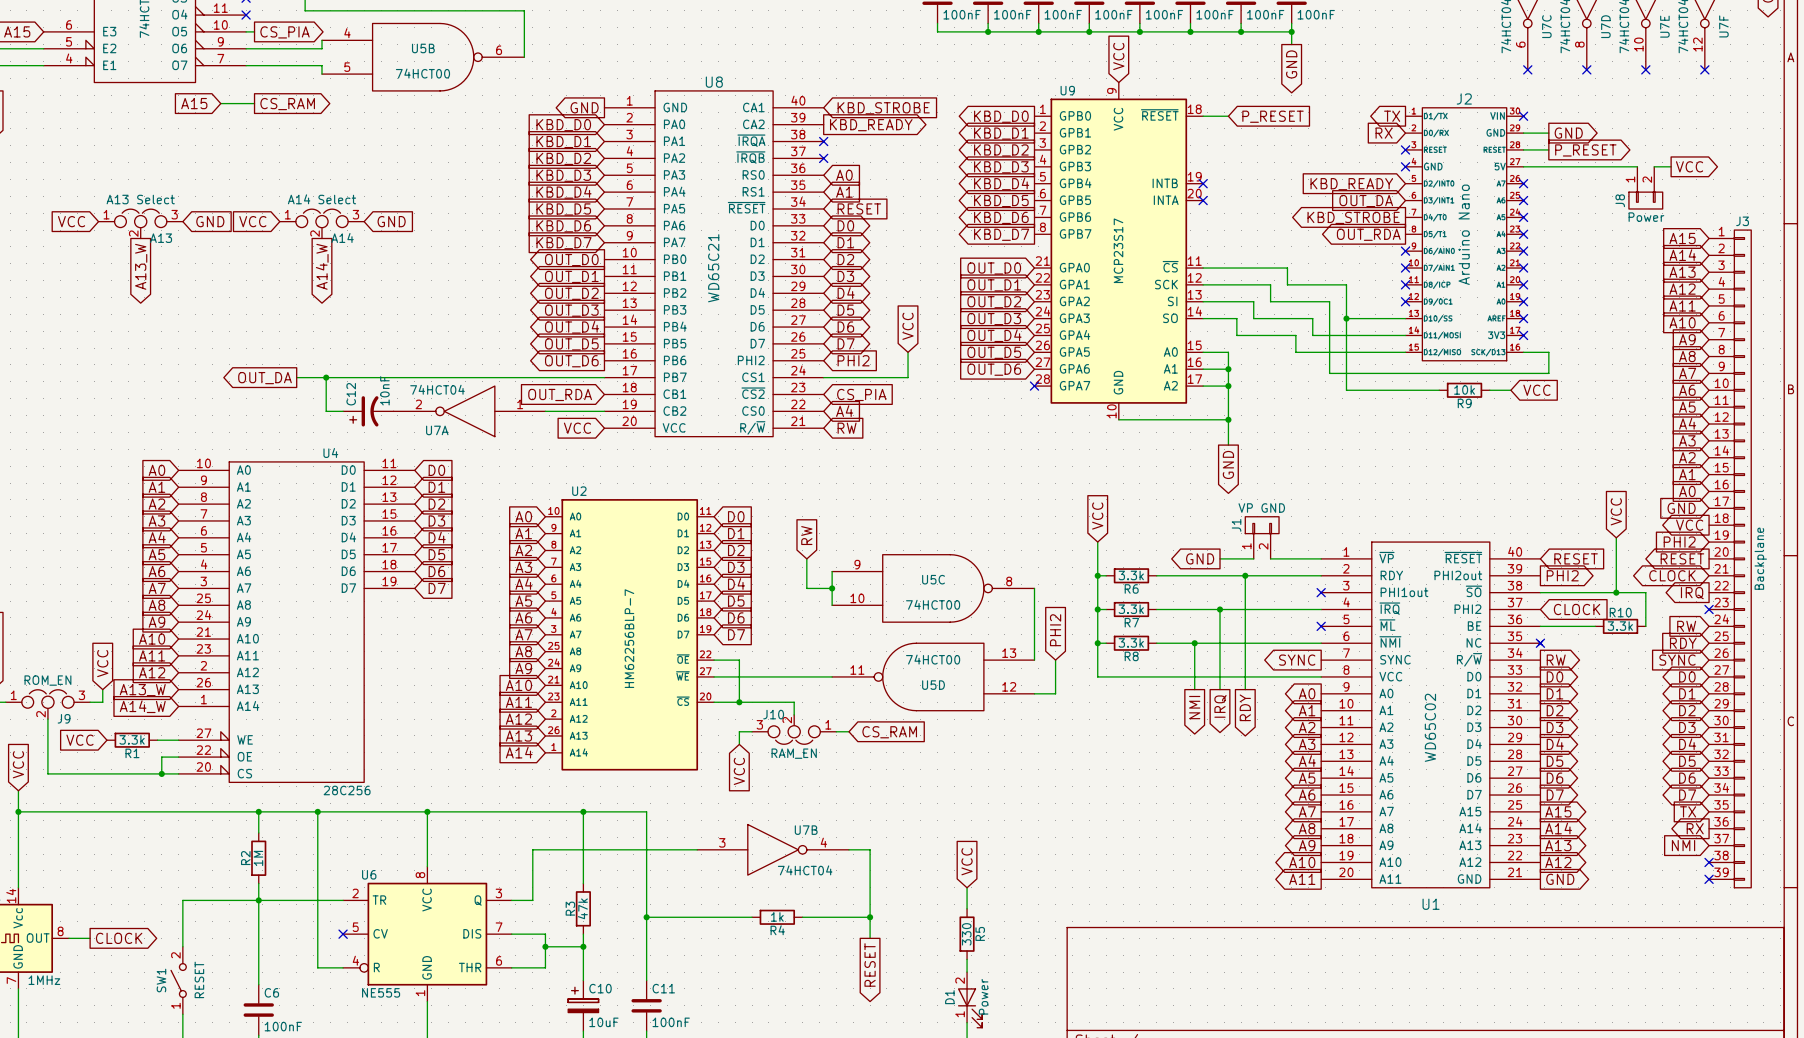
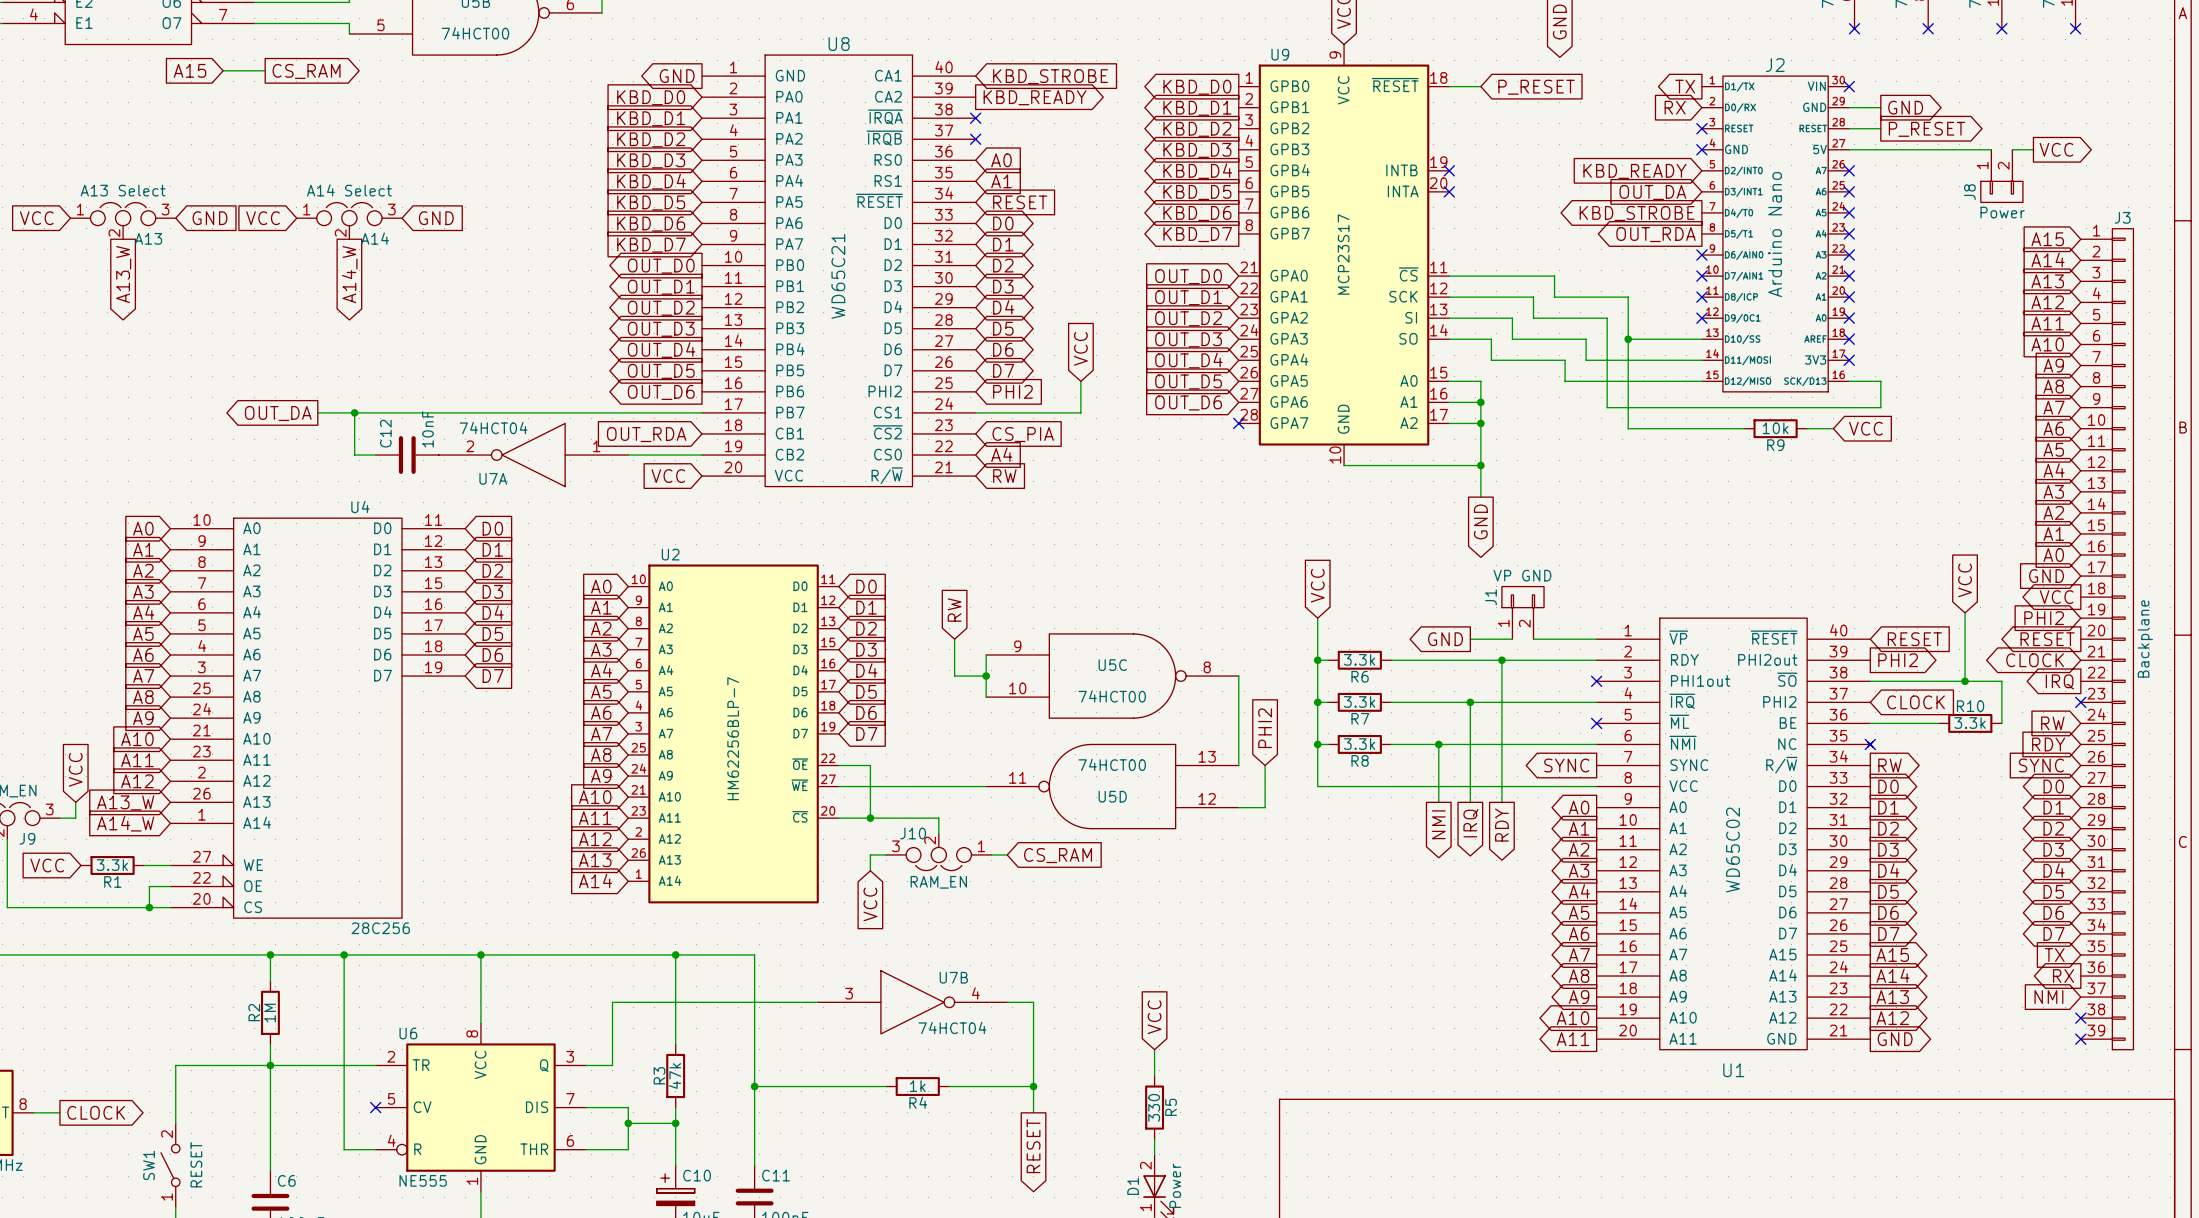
C12 symbol: [343, 396, 394, 427] -> [375, 436, 439, 474]

